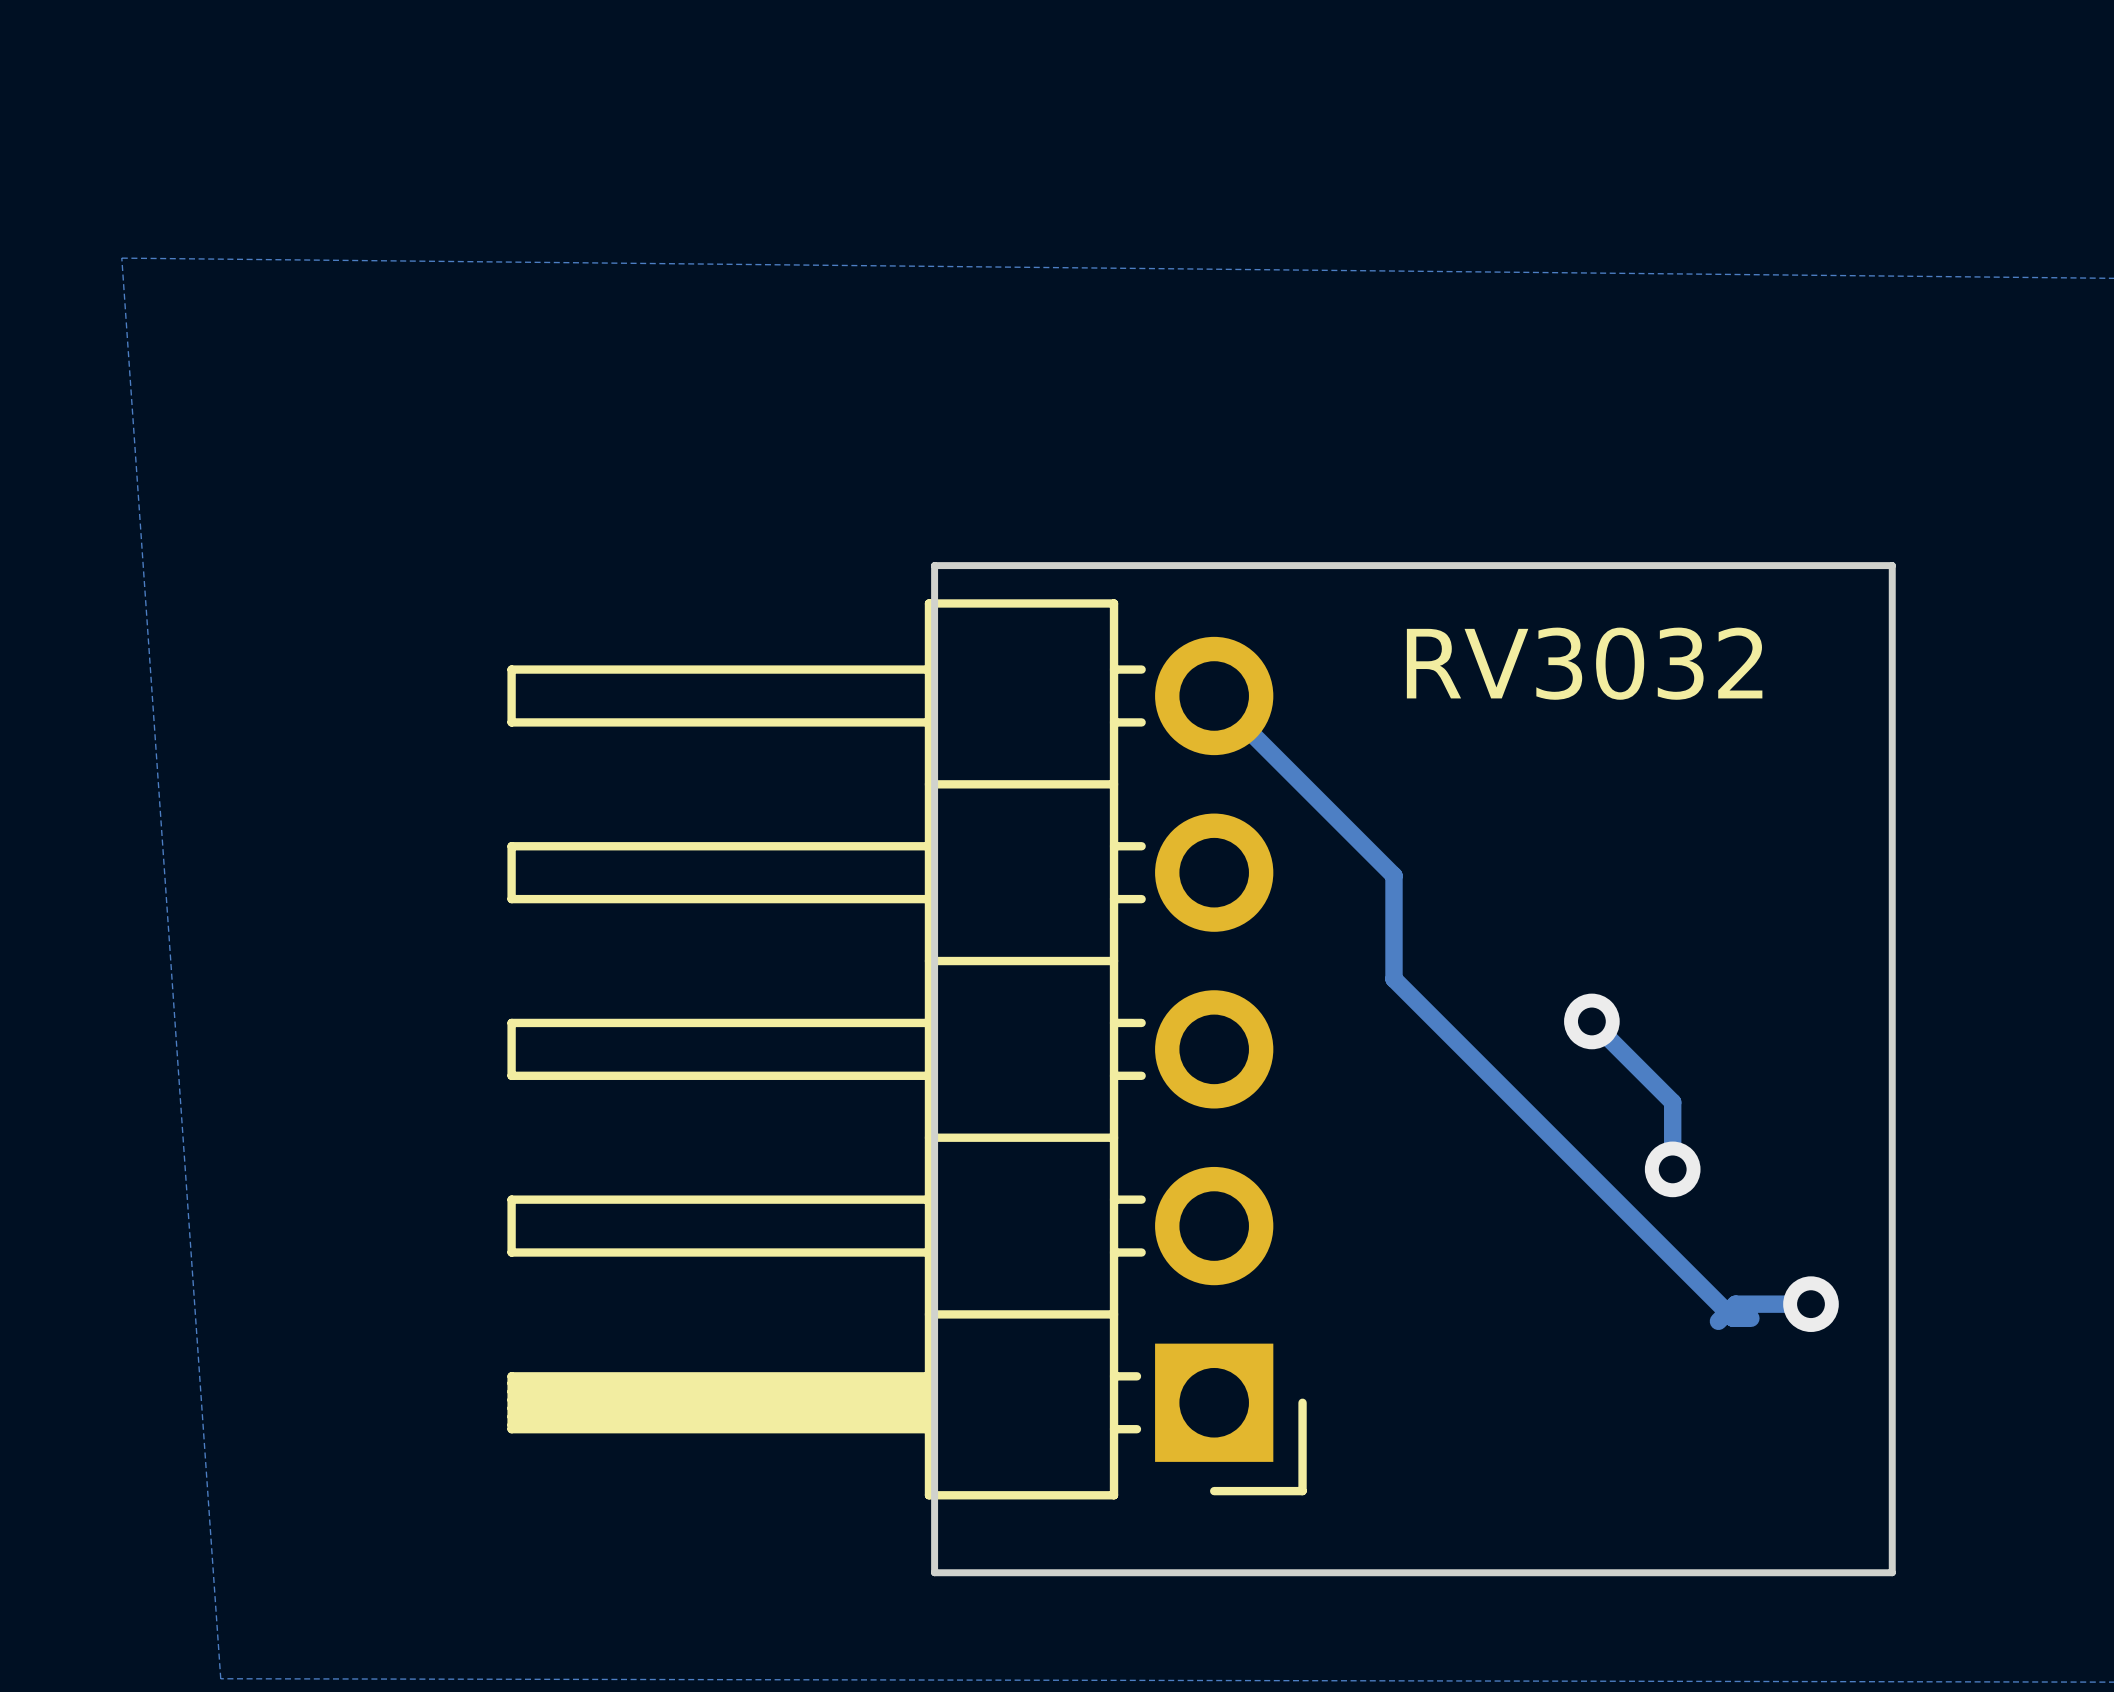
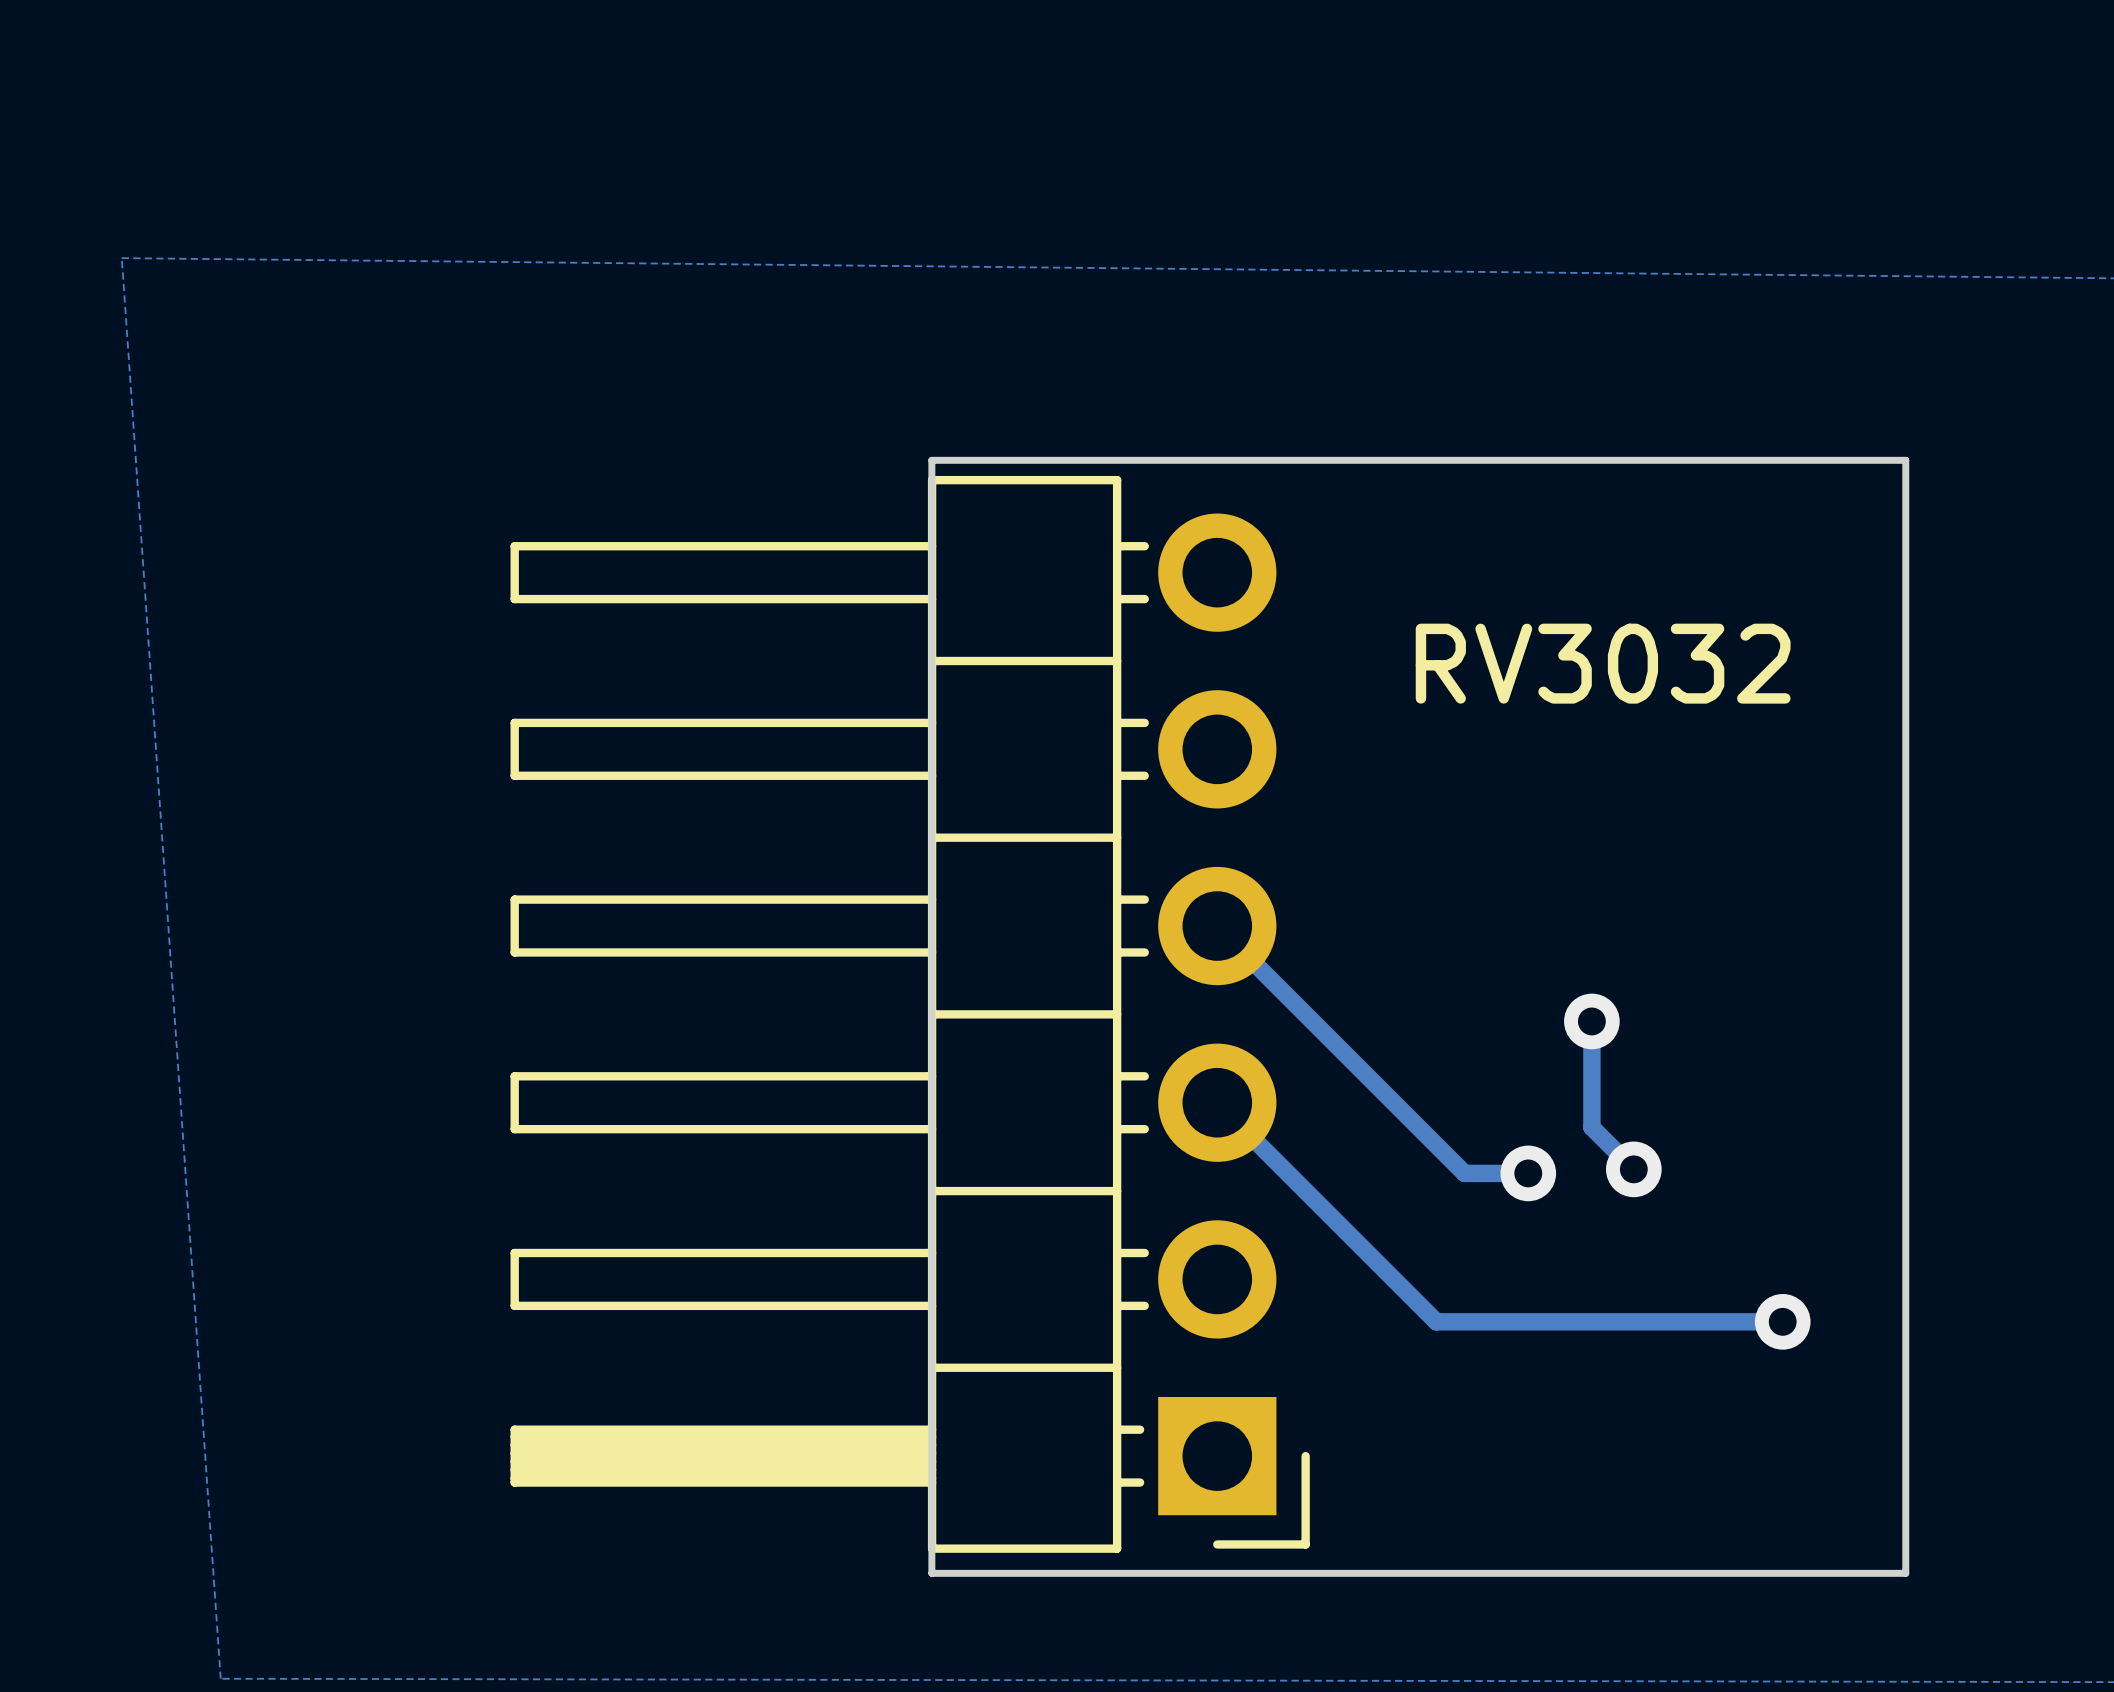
board edge: (1892, 565) (934, 565) (934, 1572) (1892, 1572) (1892, 565) -> (1905, 460) (1905, 1573) (931, 1573) (931, 460) (1905, 460)
part footprint: [507, 599, 1307, 1500] -> [510, 475, 1310, 1553]
track: (1214, 695) (1393, 875) (1393, 979) (1733, 1318) (1750, 1318) -> none
track: none -> (1217, 926) (1464, 1173) (1528, 1173)
track: (1591, 1021) (1672, 1102) (1672, 1169) -> (1591, 1021) (1591, 1127) (1633, 1169)
track: none -> (1217, 1102) (1436, 1321) (1782, 1321)
via position: (1672, 1169) -> (1633, 1169)
via: none -> (1528, 1173)
track: (1810, 1304) (1735, 1304) (1718, 1321) -> none
via position: (1810, 1304) -> (1782, 1321)

